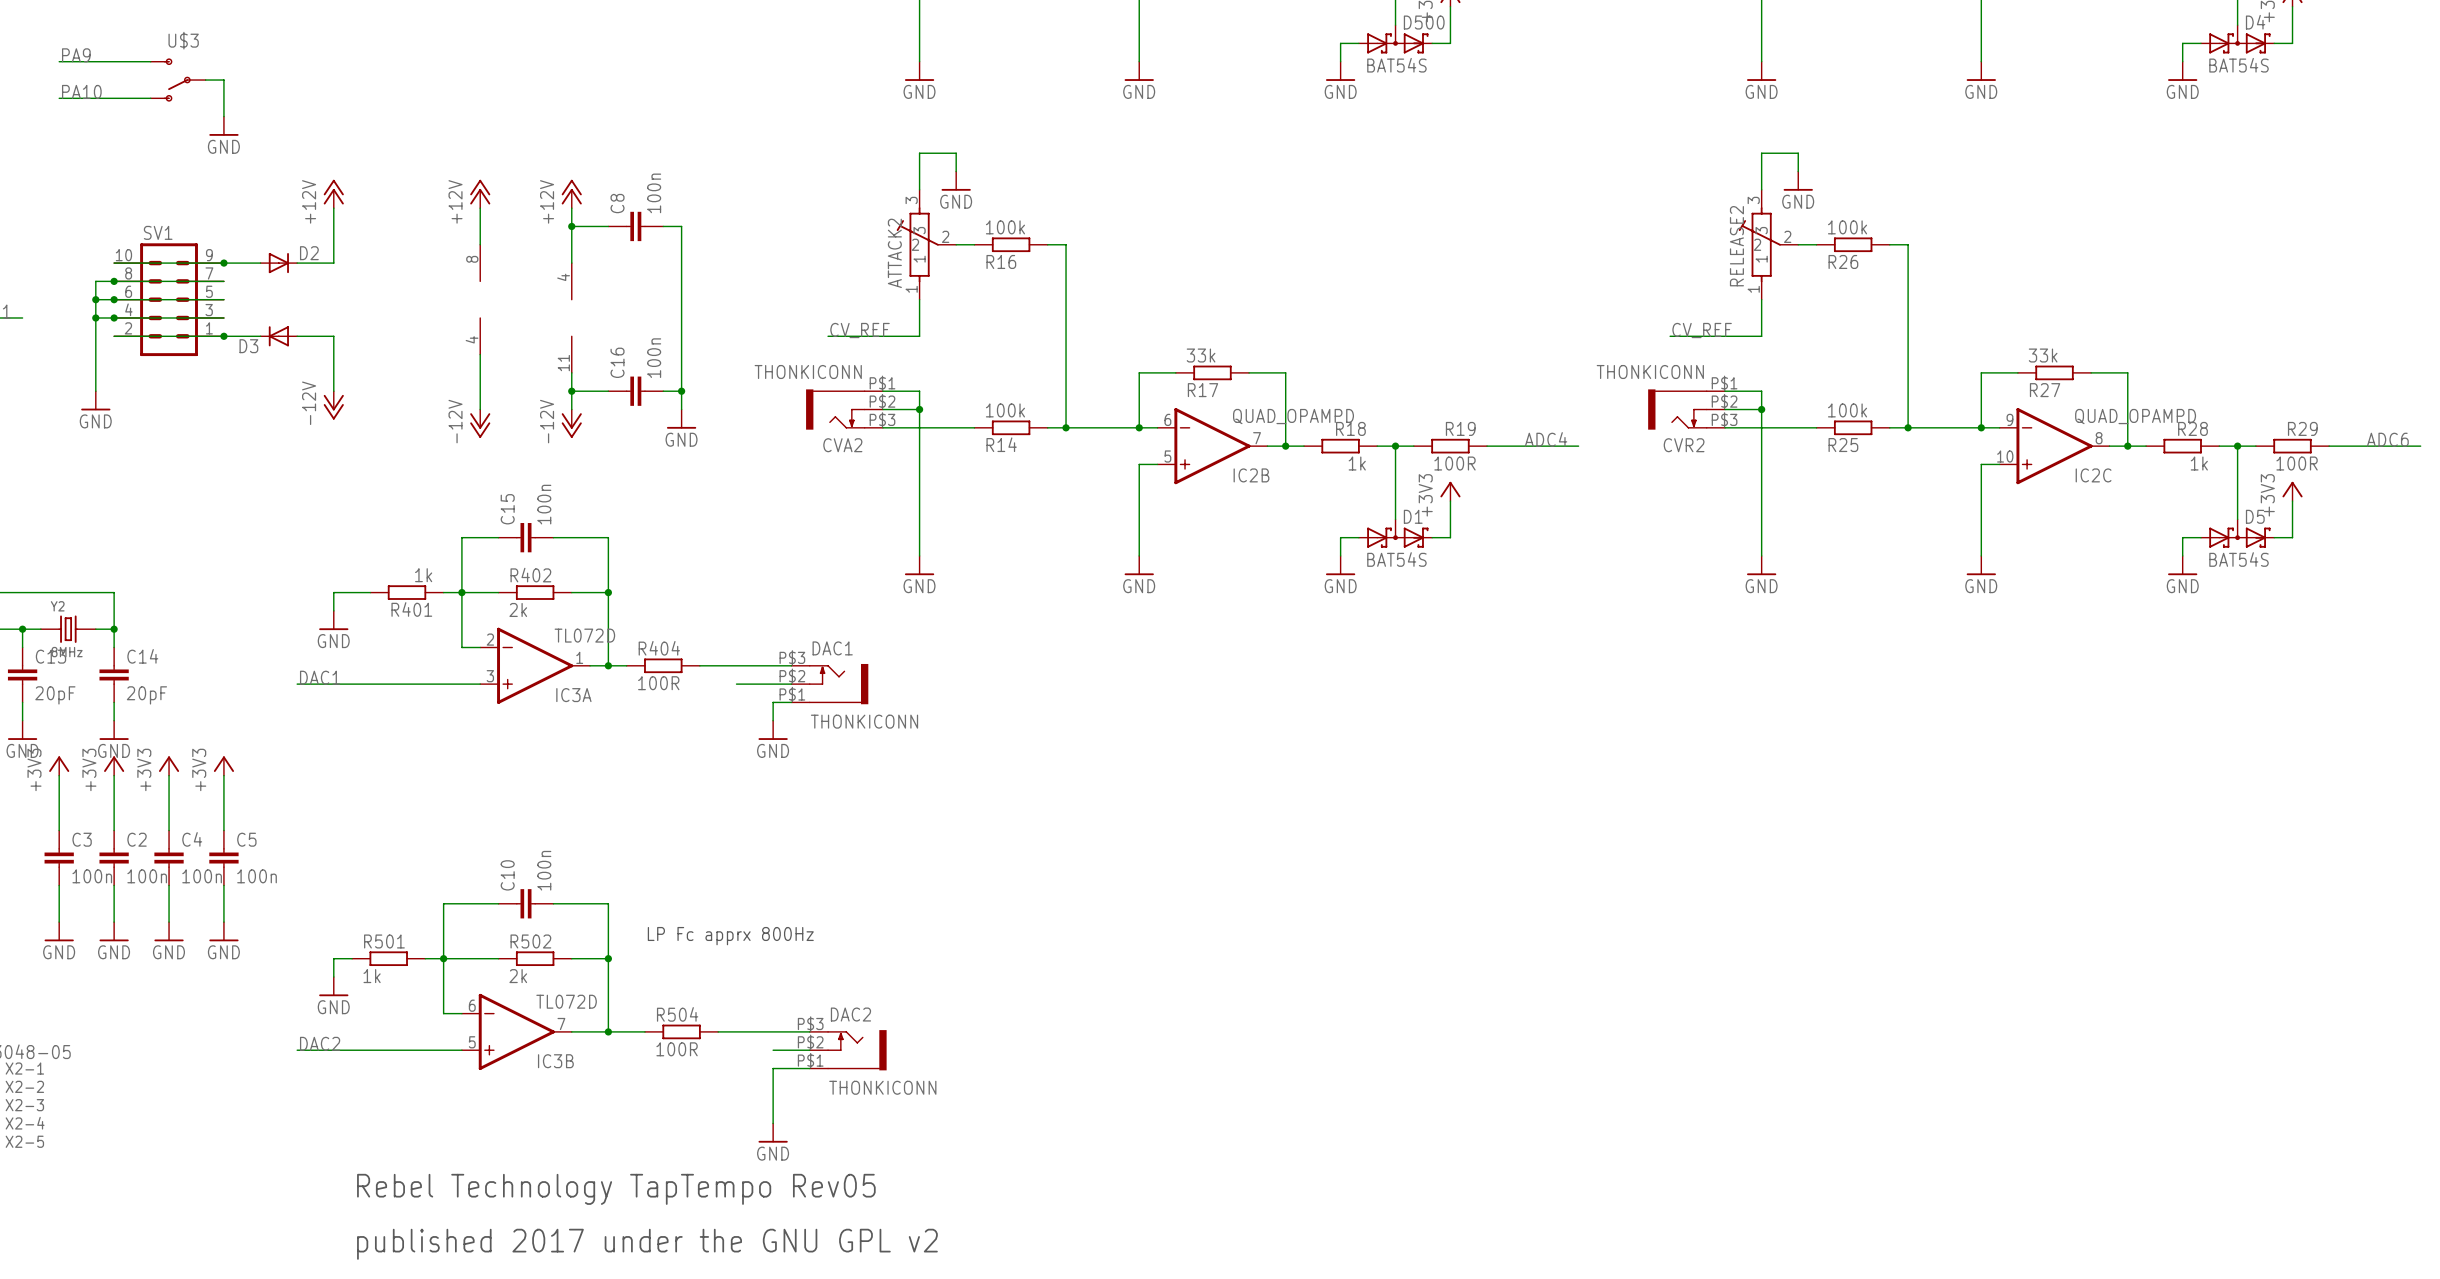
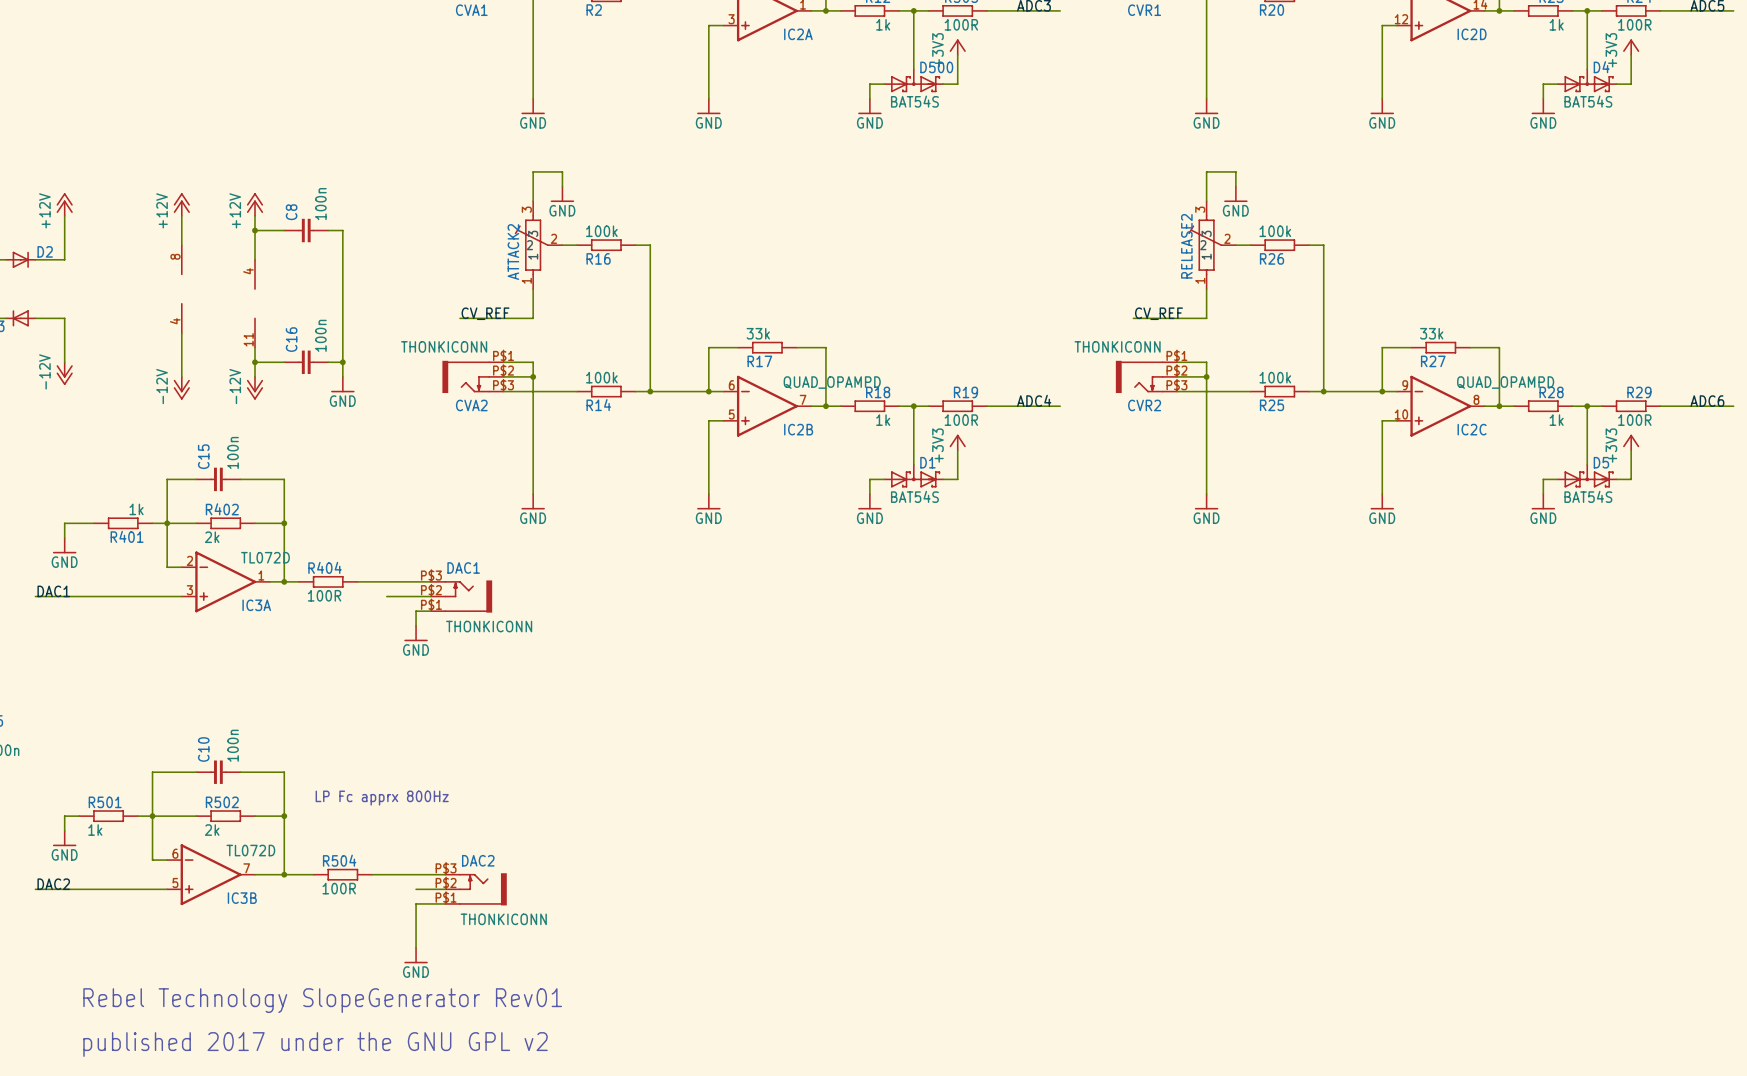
text: Rebel Technology TapTempo Rev05 (616, 1189) -> Rebel Technology SlopeGenerator Rev01 (322, 1000)

